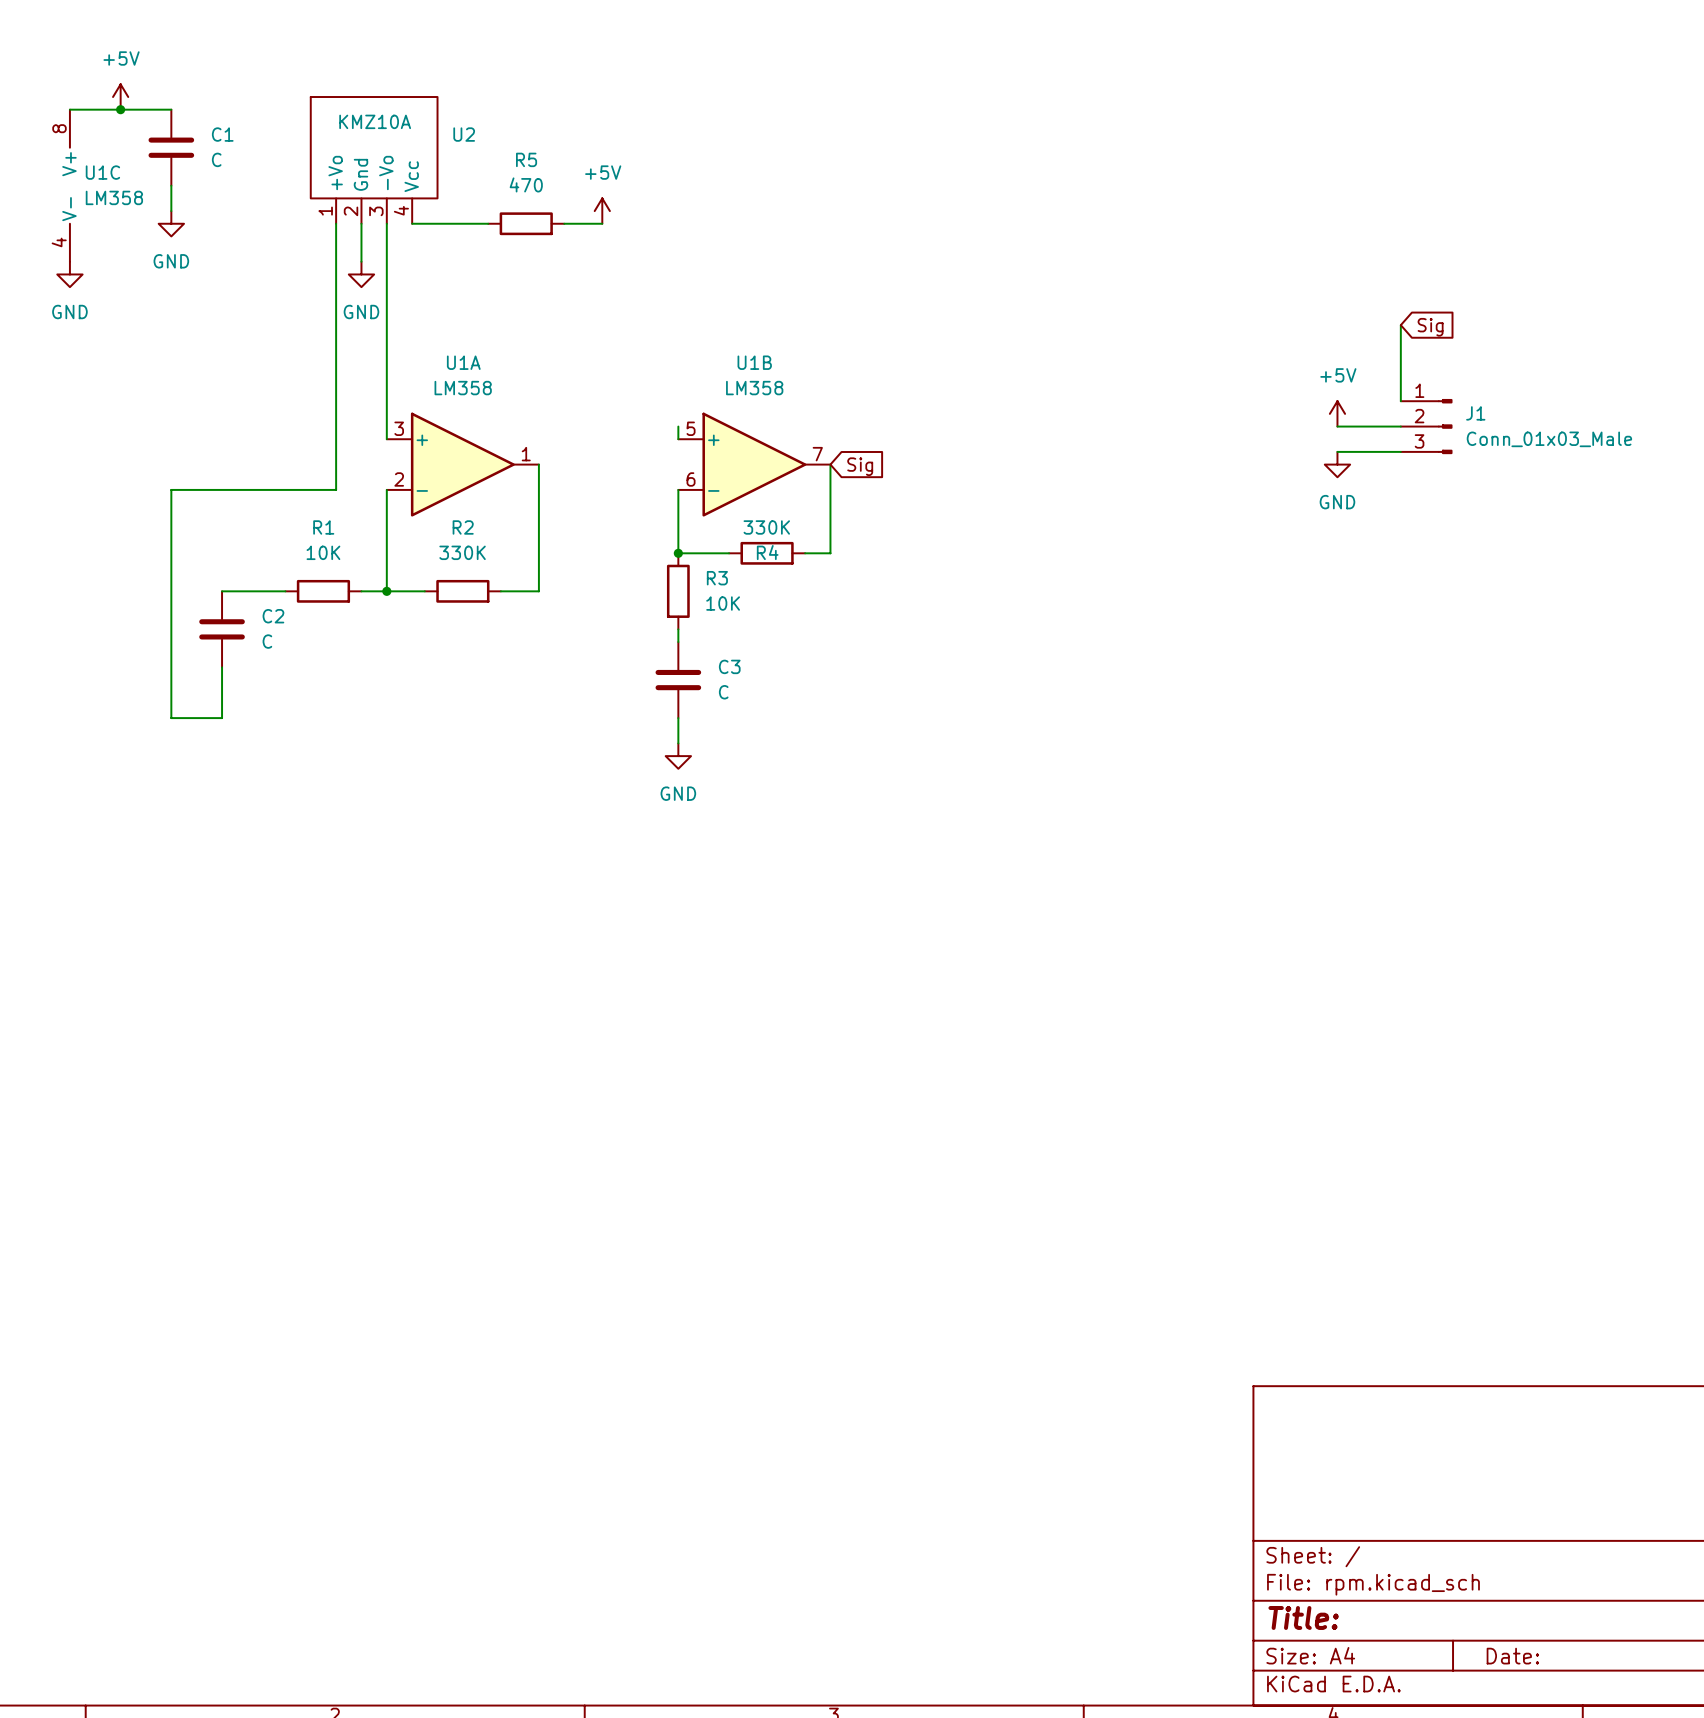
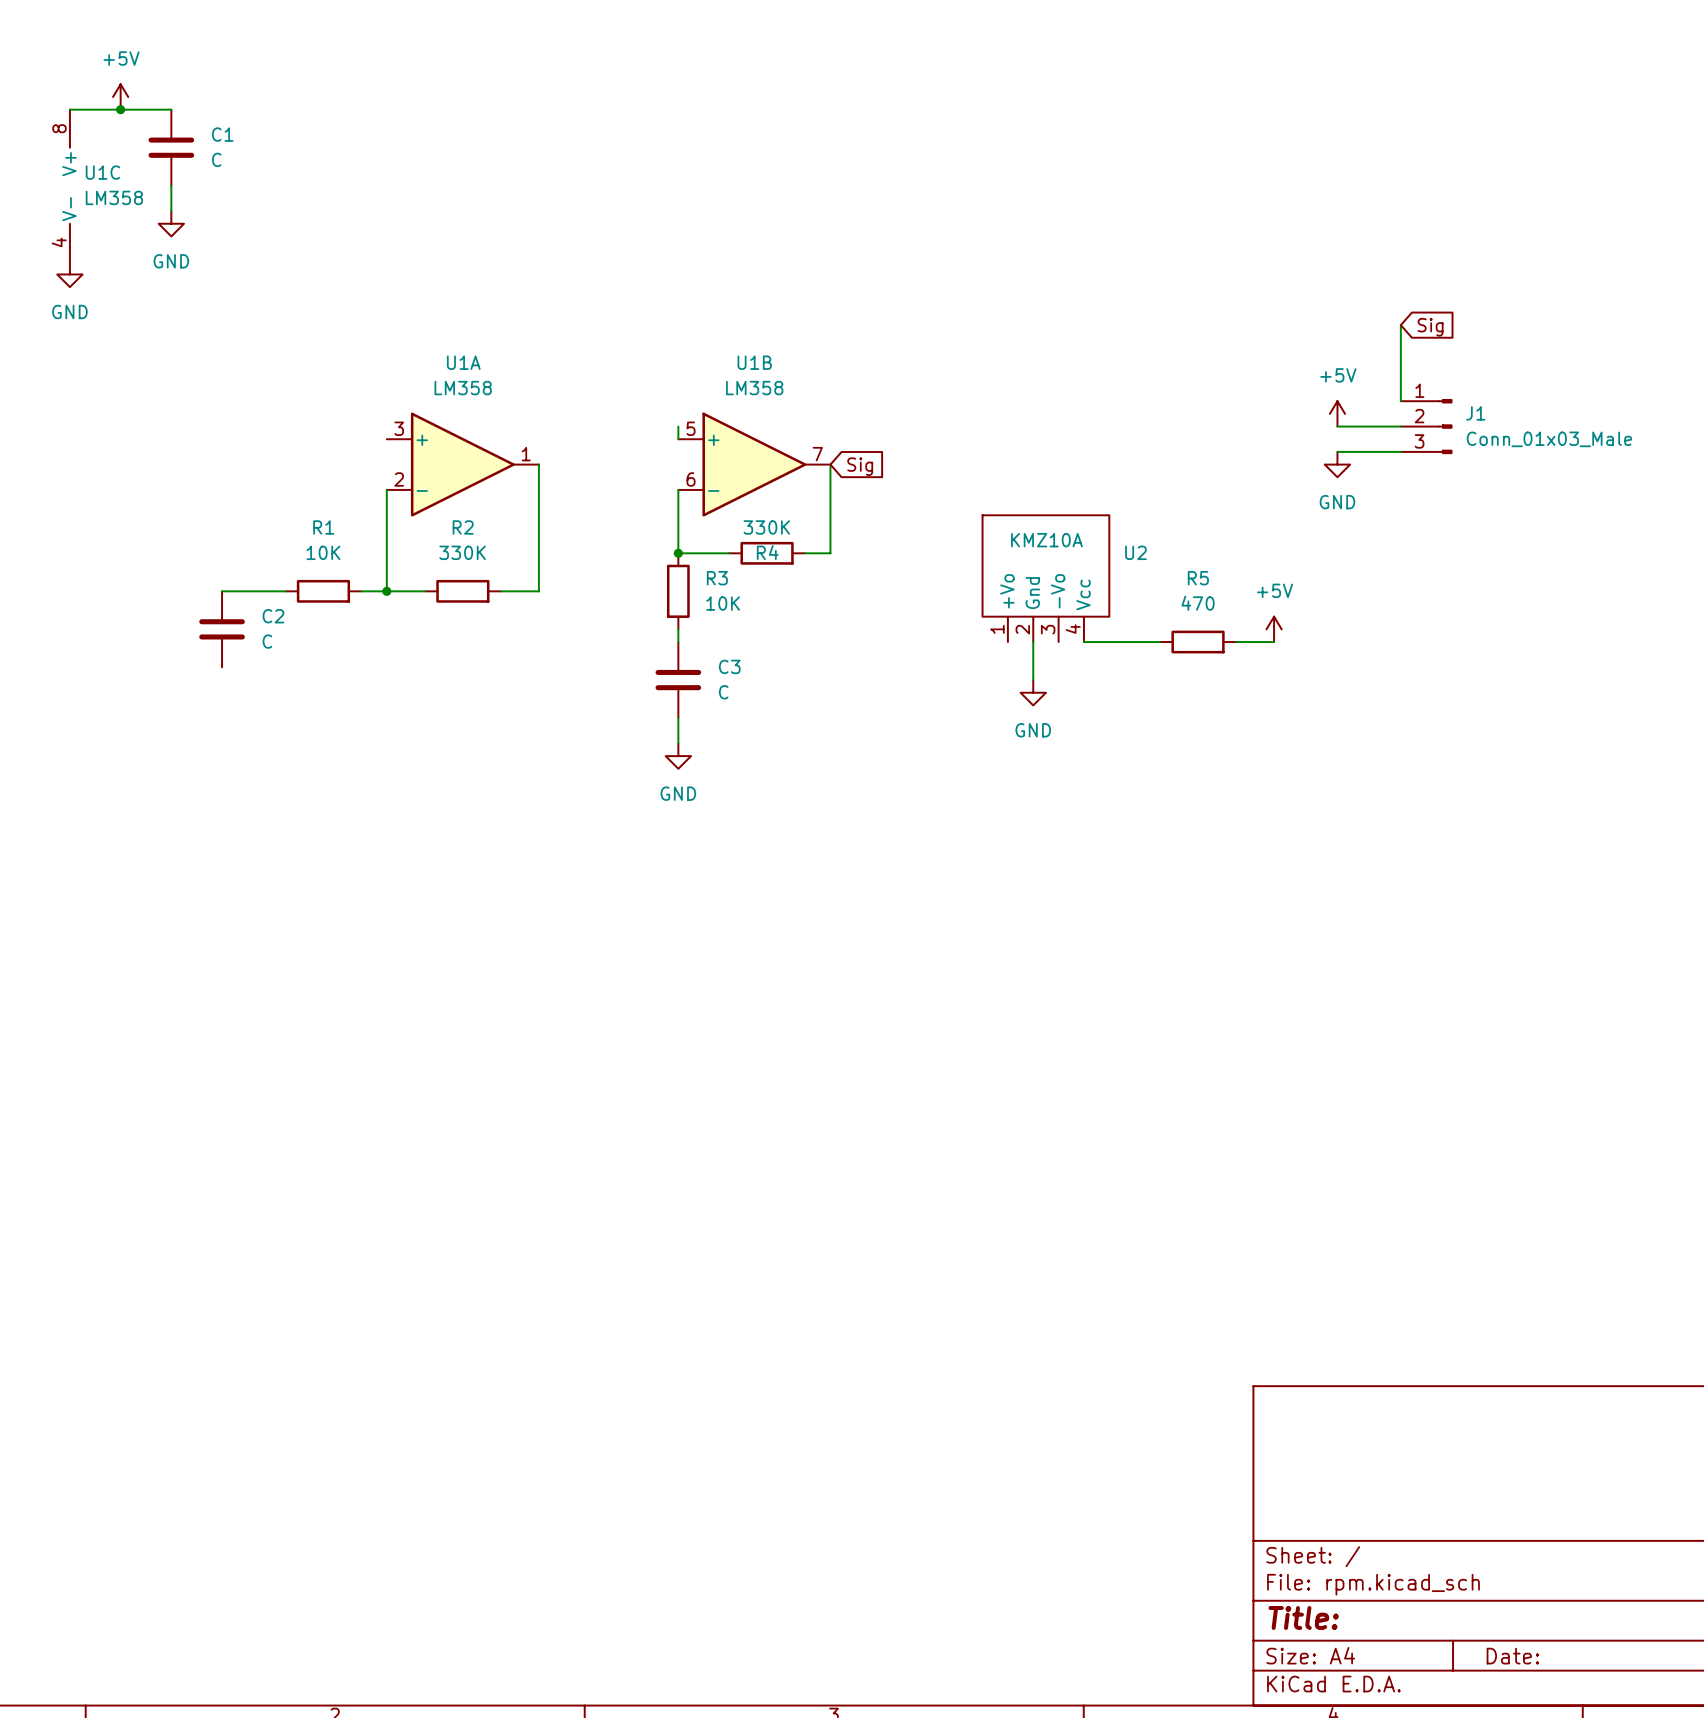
U2 position: (374, 160) -> (1045, 578)
power symbol: +5V (602, 211) -> none
wire: (336, 223) (336, 489) (171, 489) (171, 718) (222, 718) (222, 667) -> none
wire: (361, 223) (361, 261) -> none
wire: (386, 223) (386, 439) -> none
wire: (412, 223) (488, 223) -> none
R5 position: (526, 223) -> (1198, 642)
wire: (564, 223) (602, 223) -> none
power symbol: GND (361, 274) -> none
power symbol: none -> +5V (1274, 629)
wire: none -> (1033, 642) (1033, 680)
wire: none -> (1083, 642) (1160, 642)
wire: none -> (1236, 642) (1274, 642)
power symbol: none -> GND (1033, 692)

